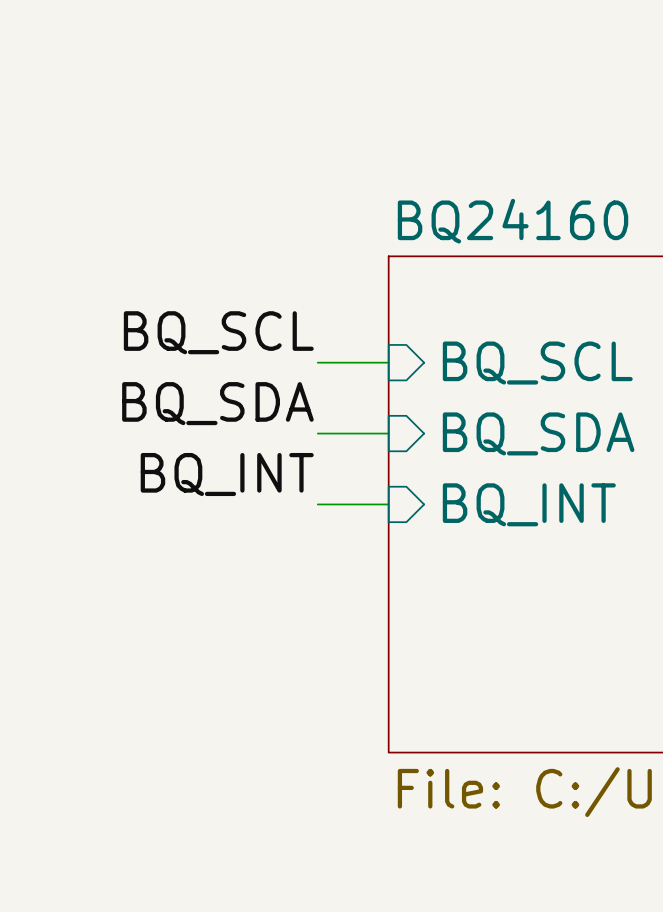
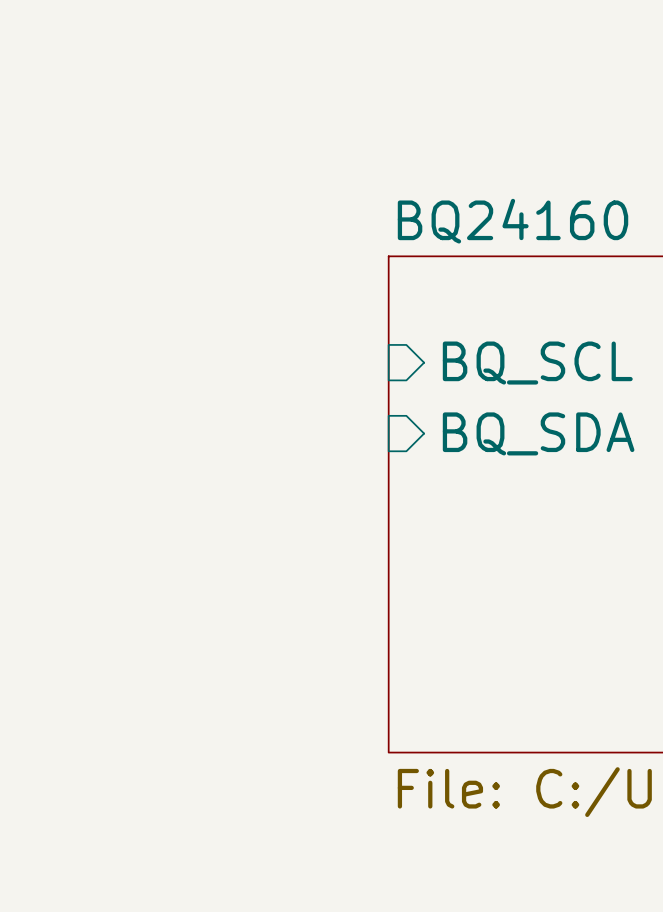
label: BQ_SCL (218, 332) -> none
wire: (317, 362) (388, 362) -> none
label: BQ_SDA (217, 403) -> none
wire: (317, 433) (388, 433) -> none
label: BQ_INT (227, 474) -> none
wire: (317, 504) (388, 504) -> none
sheet pin: BQ_INT (529, 504) -> none

